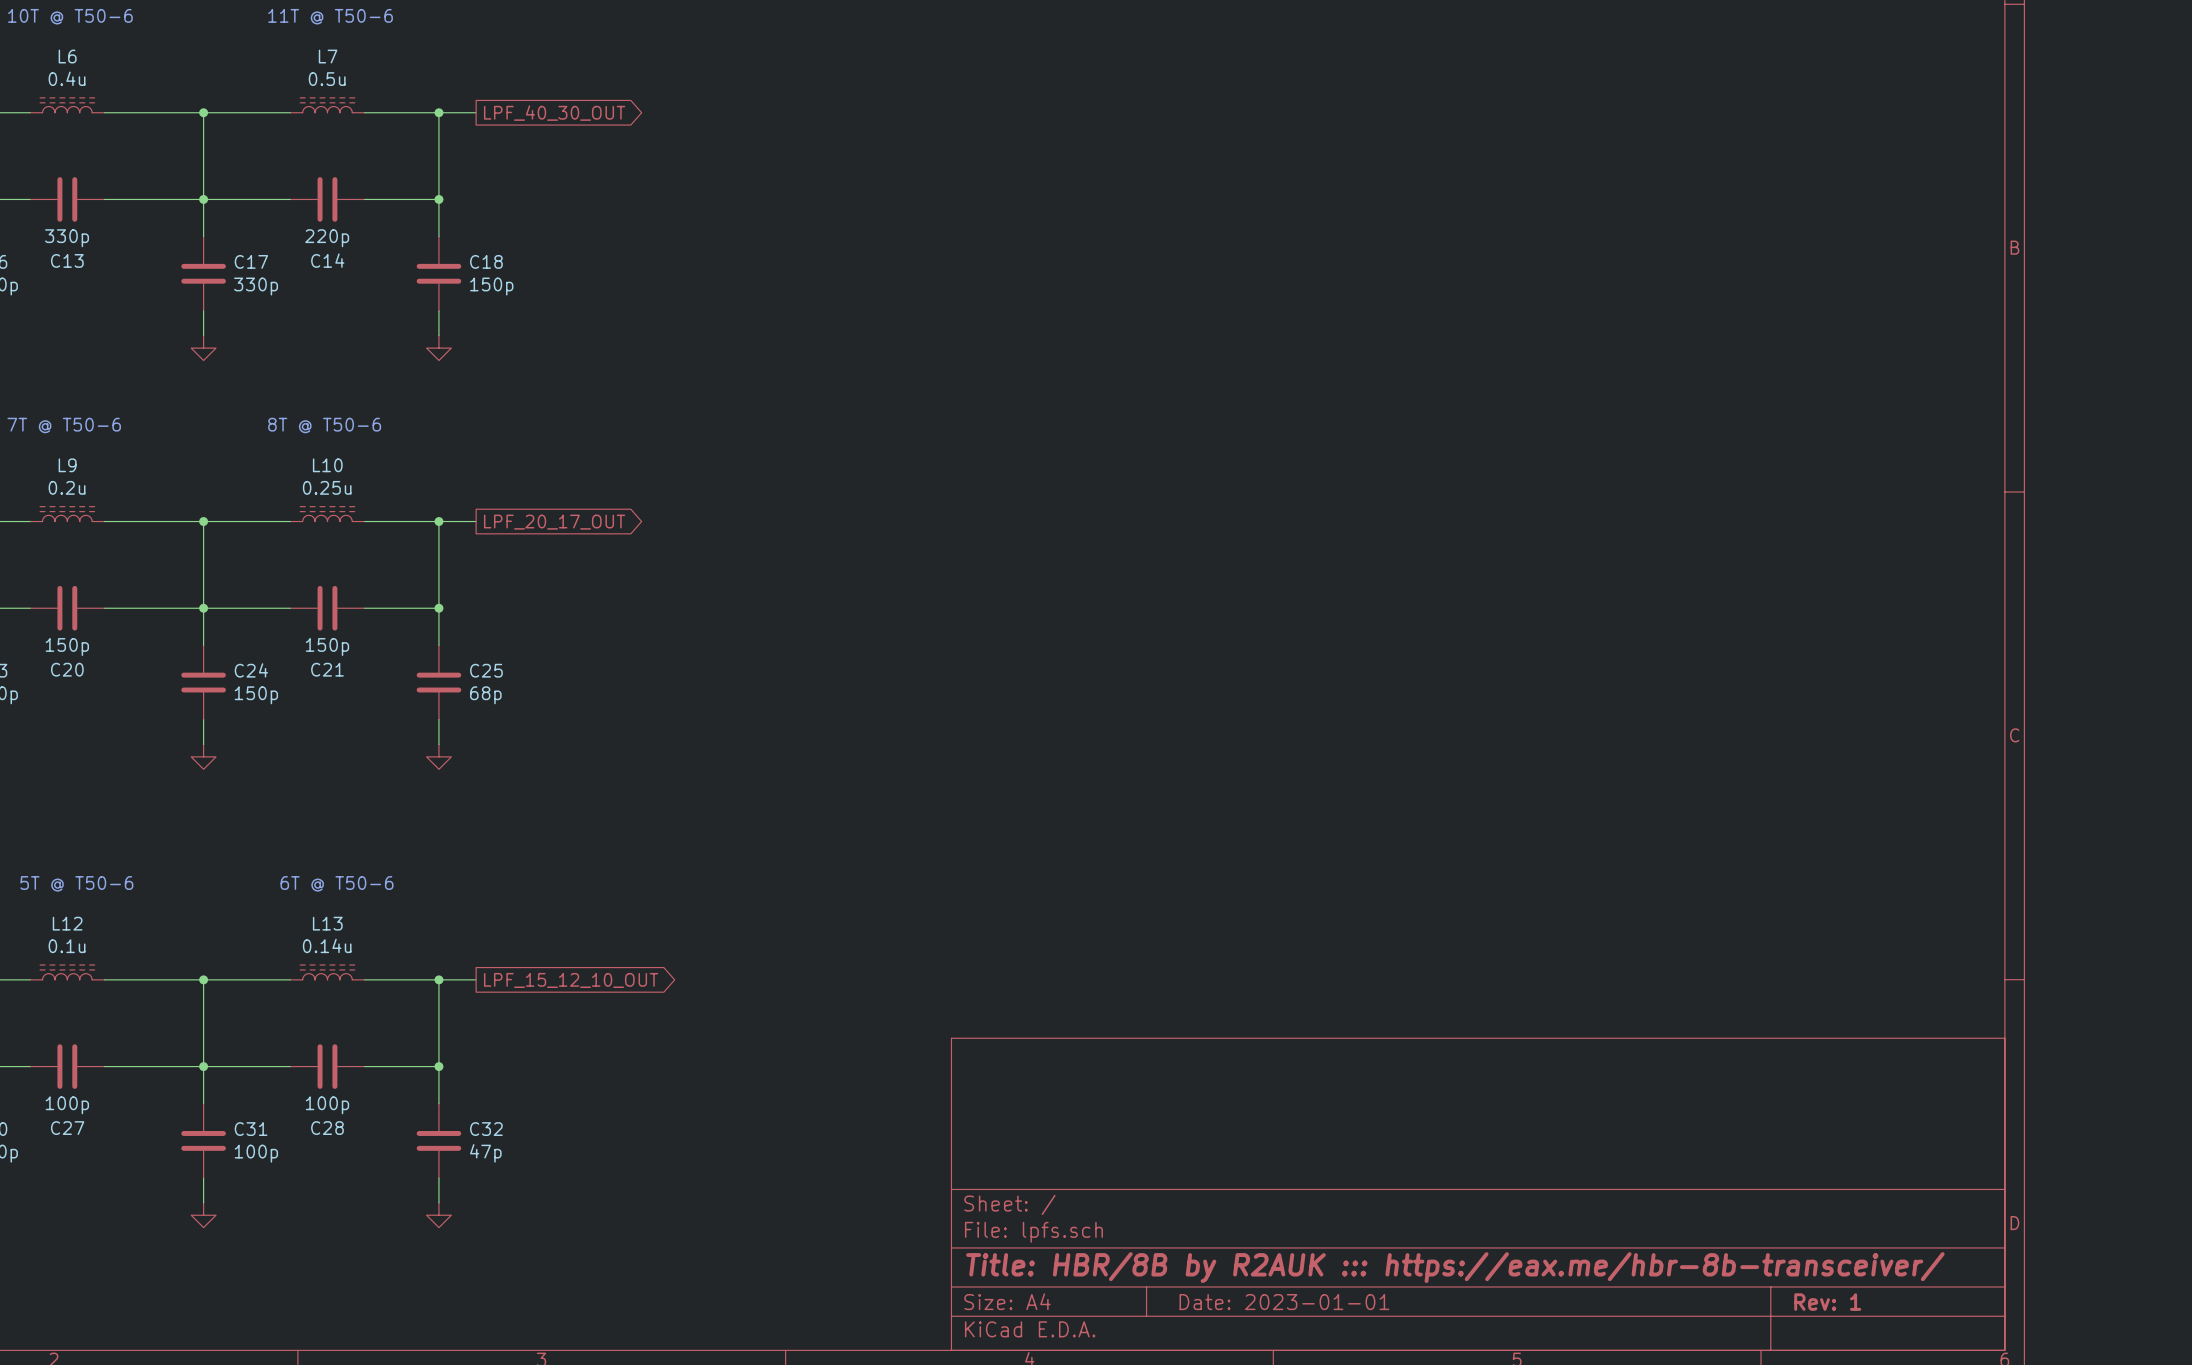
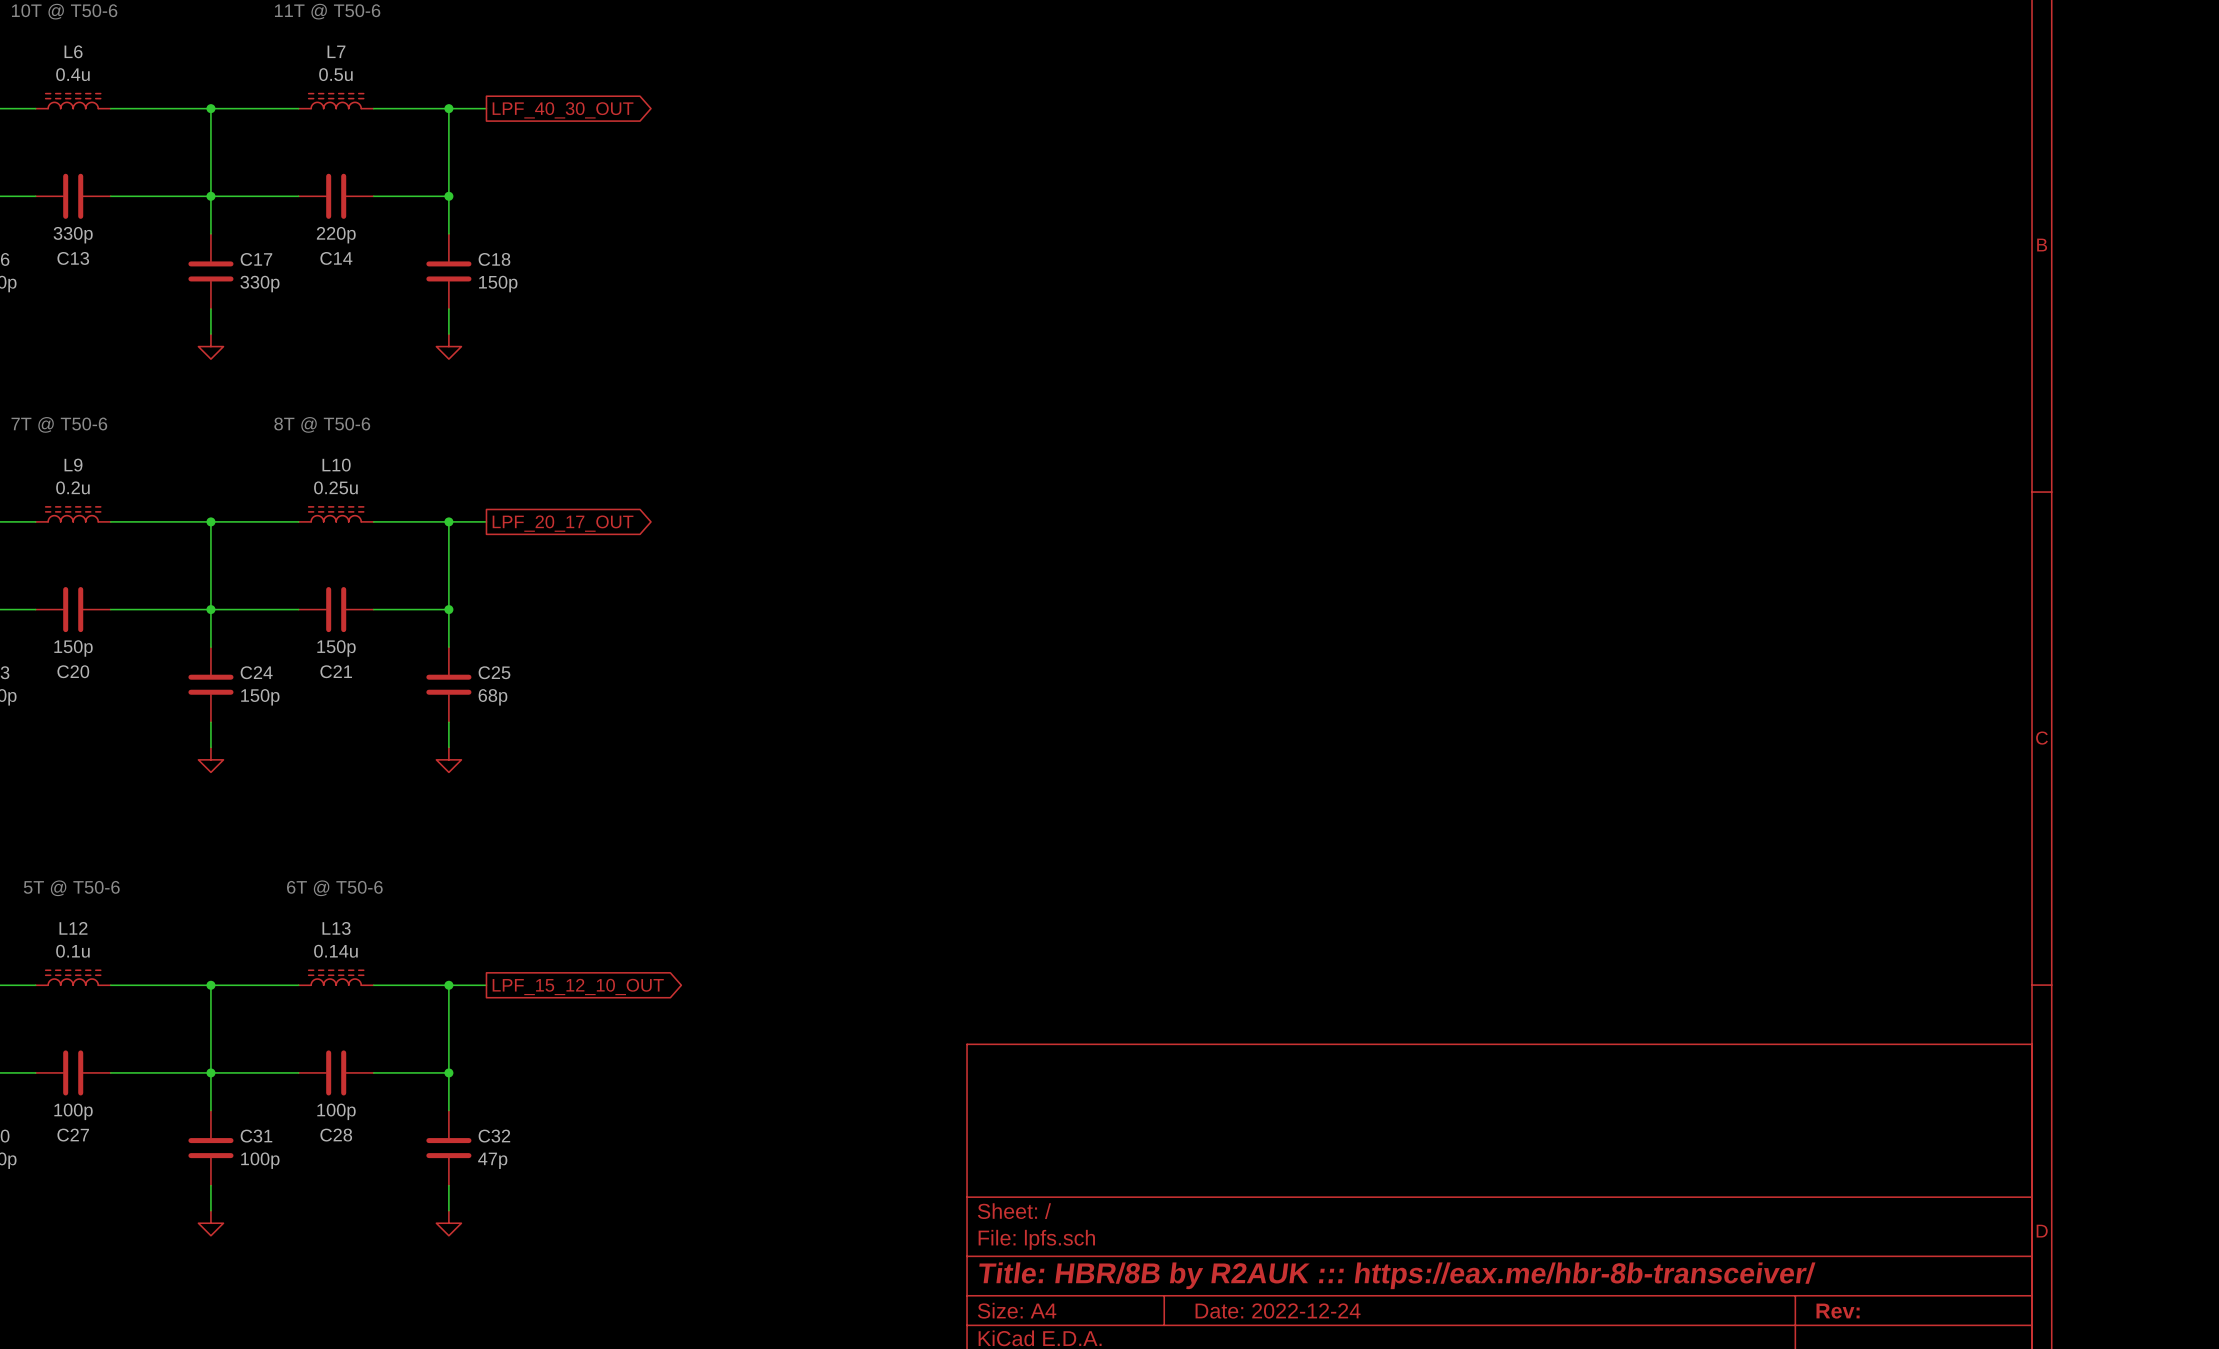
title block: Date: 2023-01-01 (1284, 1302) -> Date: 2022-12-24 (1278, 1310)
title block: Rev: 1 (1827, 1302) -> Rev: (1838, 1311)

